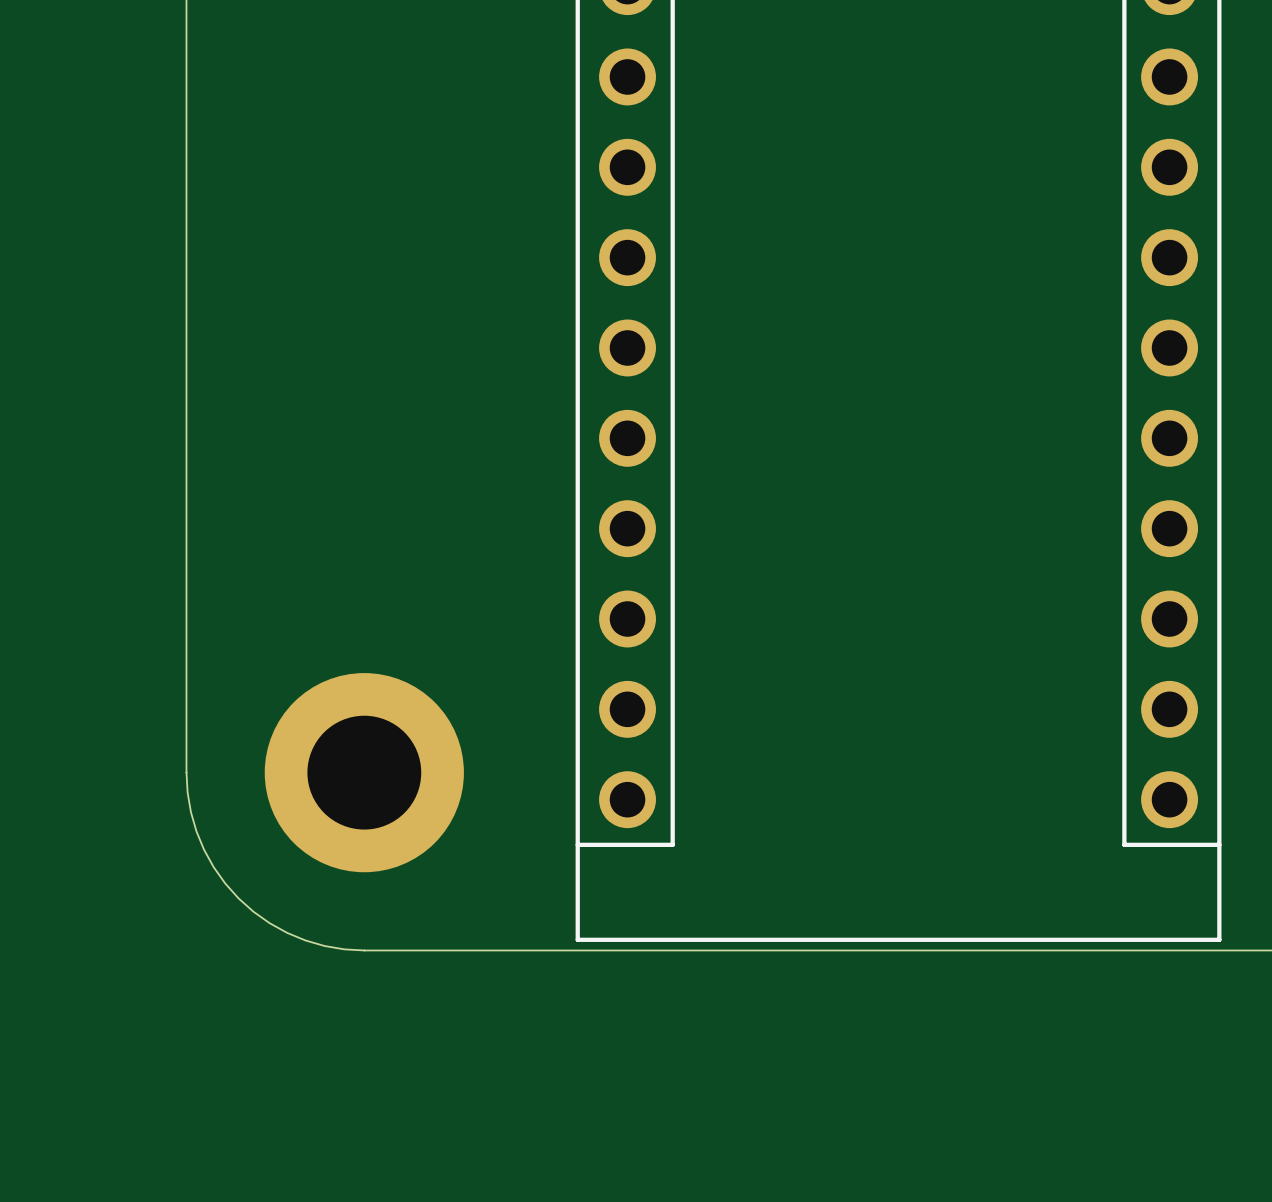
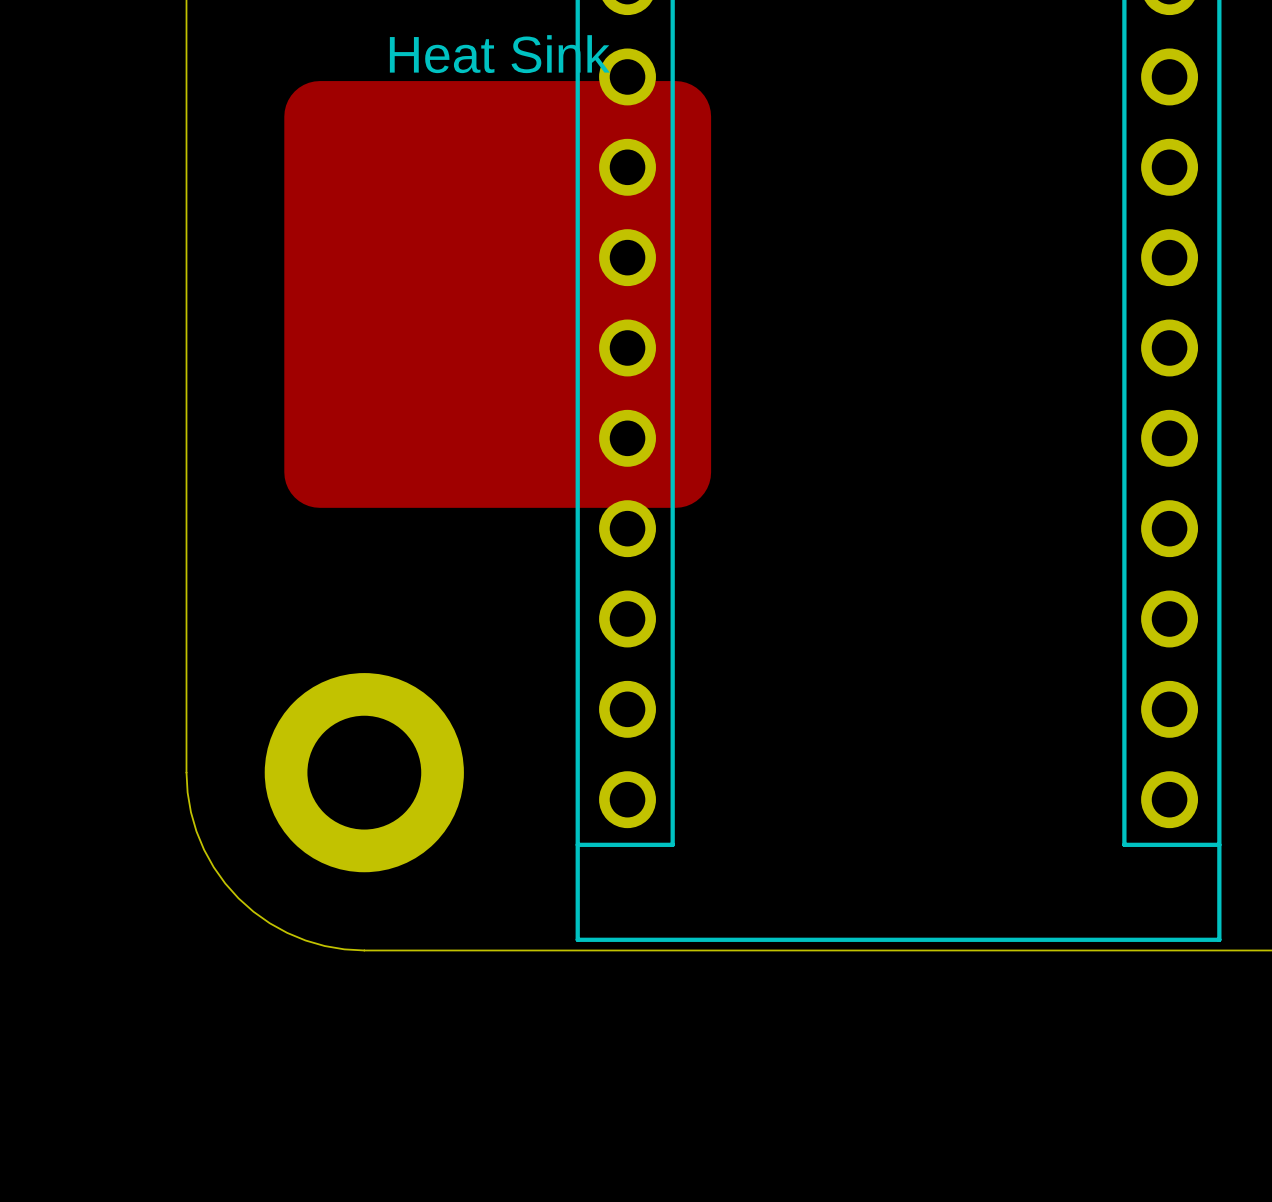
part: none -> (497, 294)

